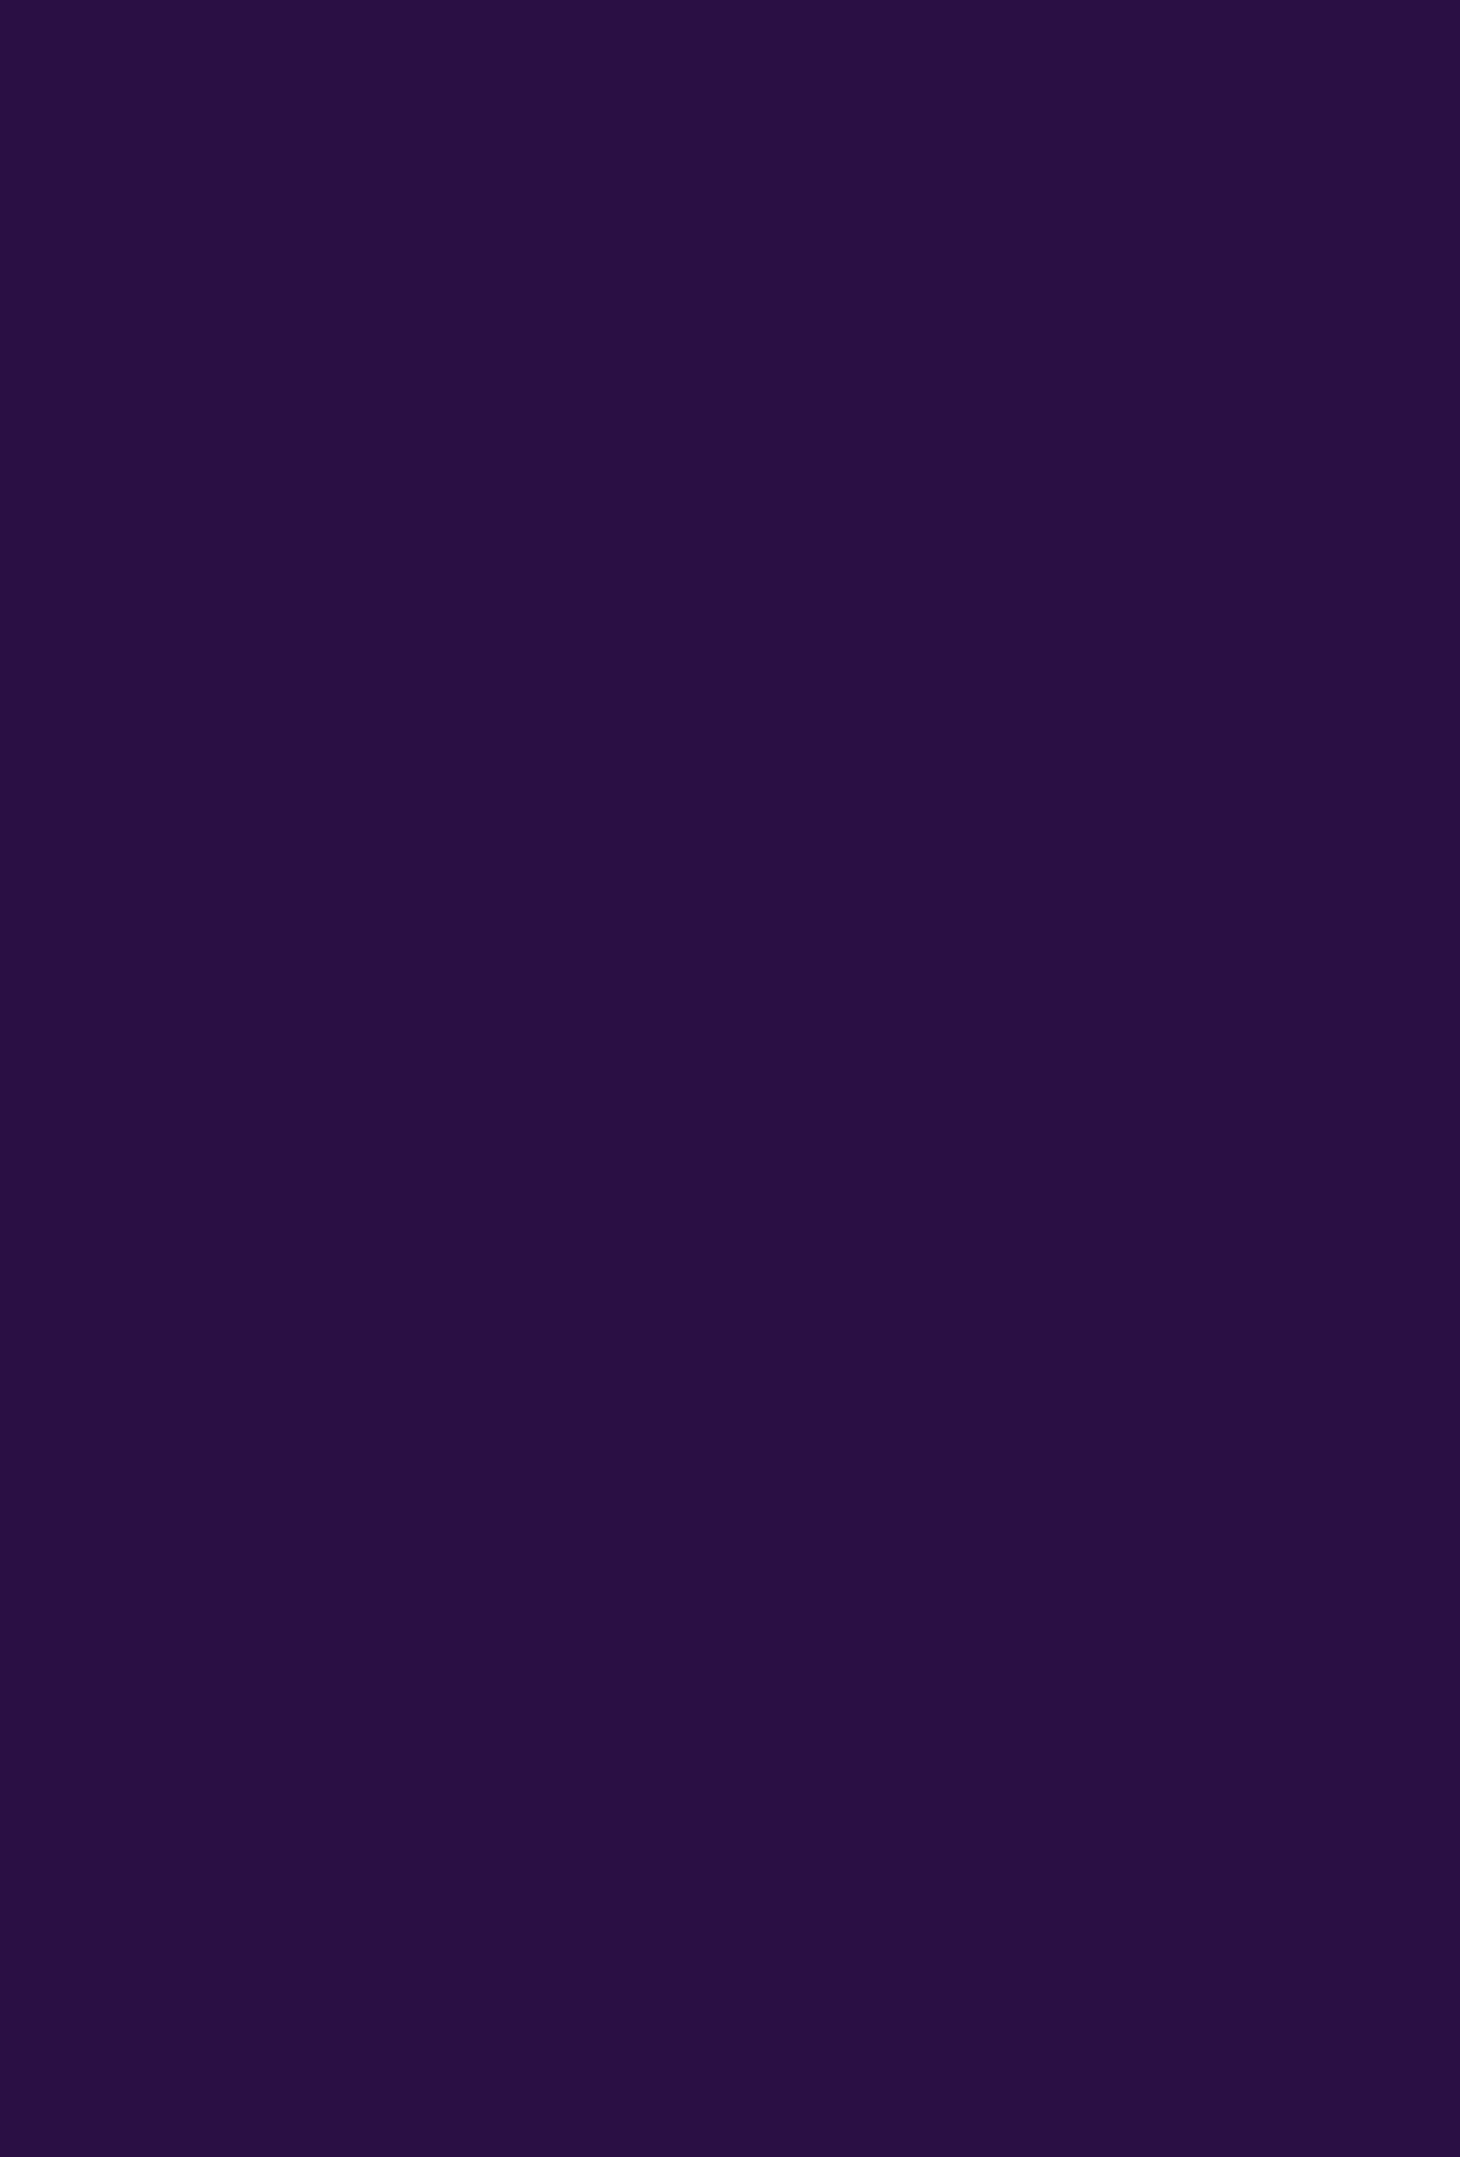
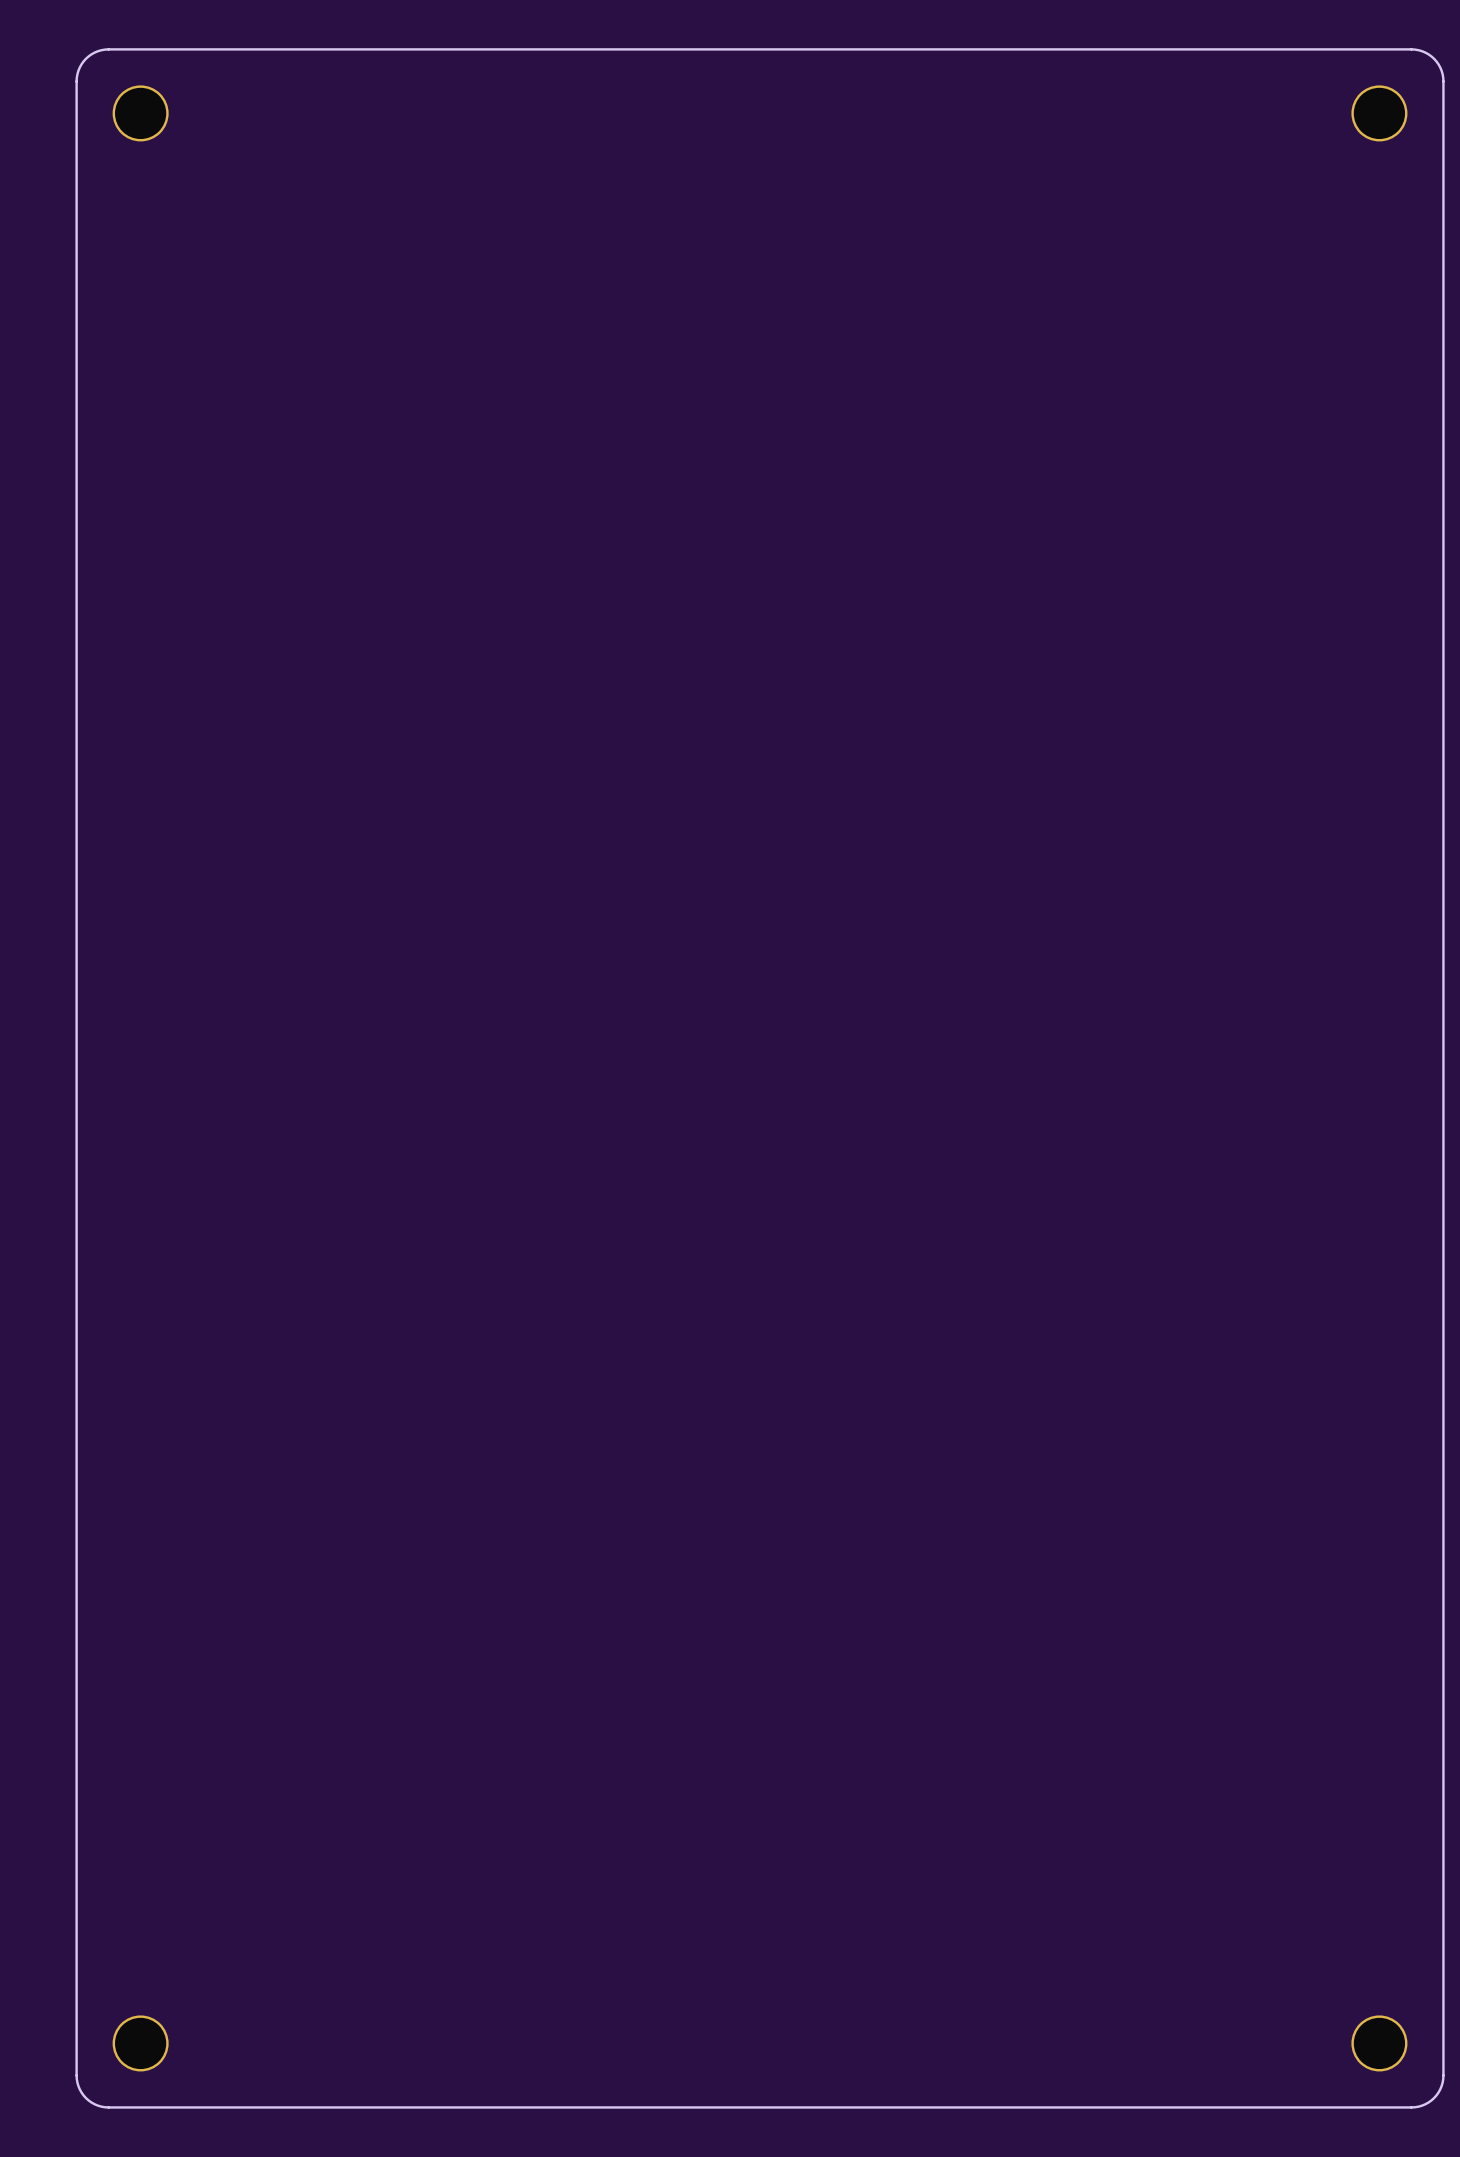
board edge: none -> (108, 49) (1411, 49) (1428, 54) (1438, 64) (1443, 81) (1443, 2075) (1440, 2089) (1428, 2102) (1411, 2107) (108, 2107) (91, 2102) (81, 2092) (76, 2075) (76, 81) (79, 67) (85, 58) (98, 51) (108, 49)
part: none -> (140, 113)
part: none -> (1379, 113)
part: none -> (140, 2043)
part: none -> (1379, 2043)

